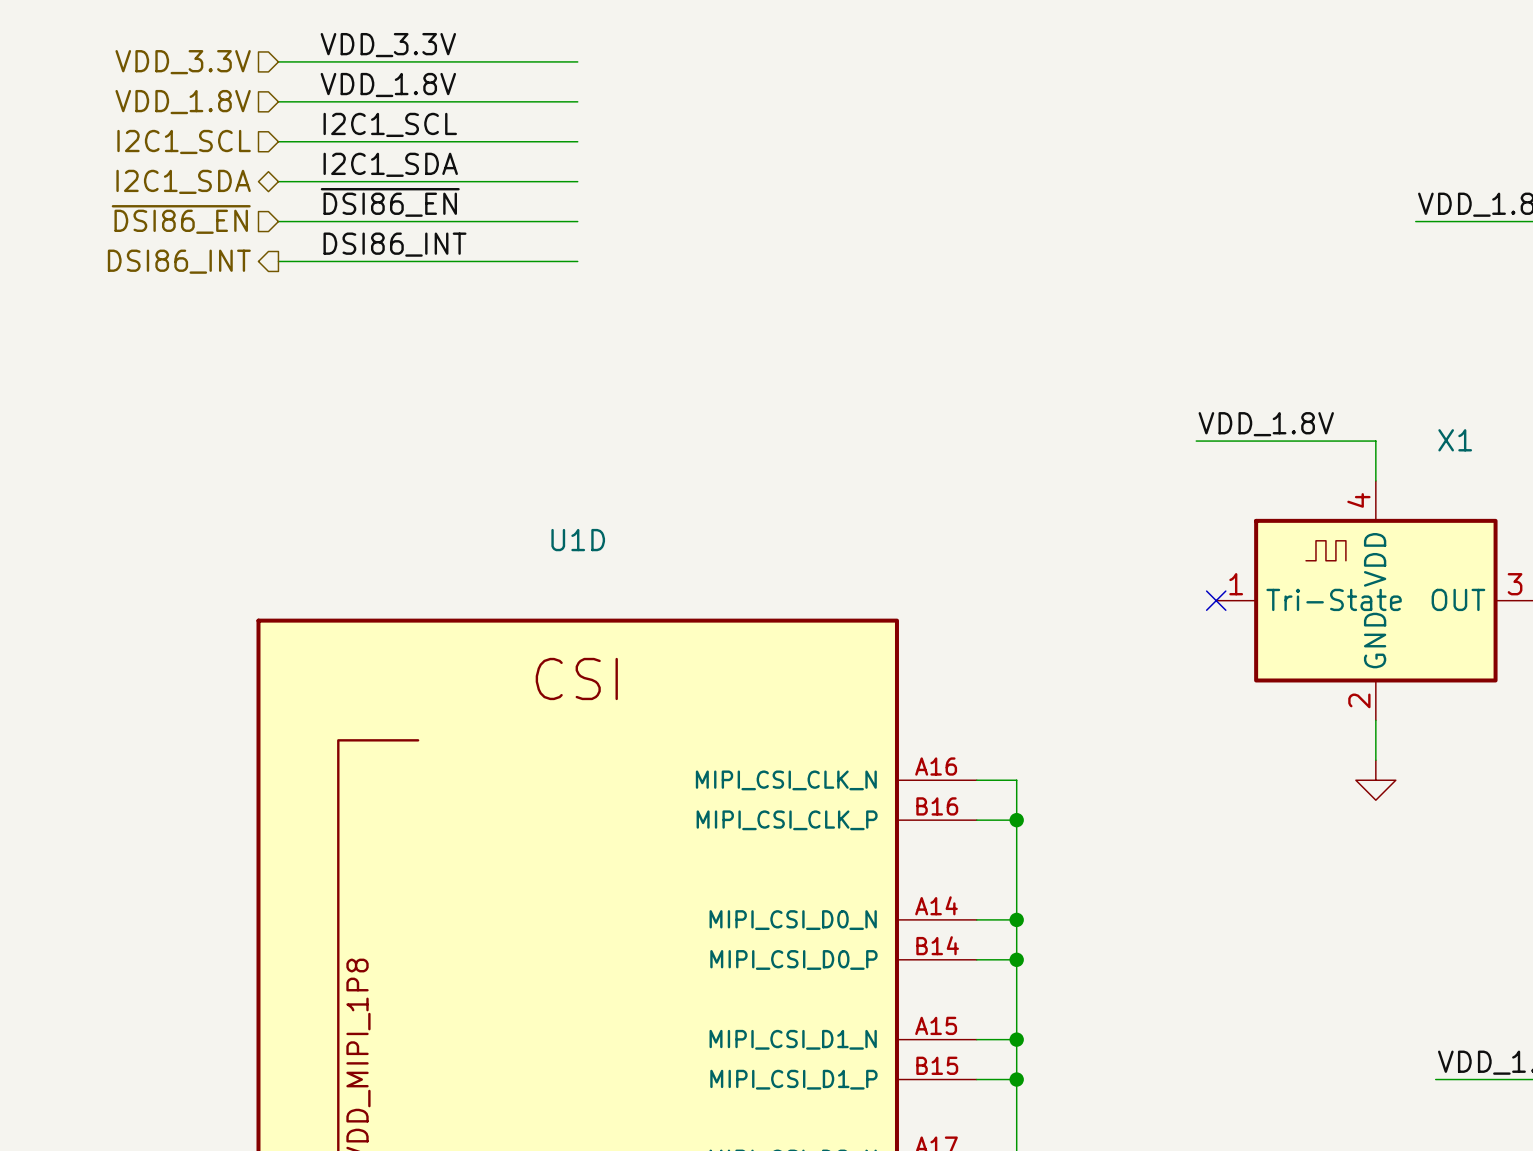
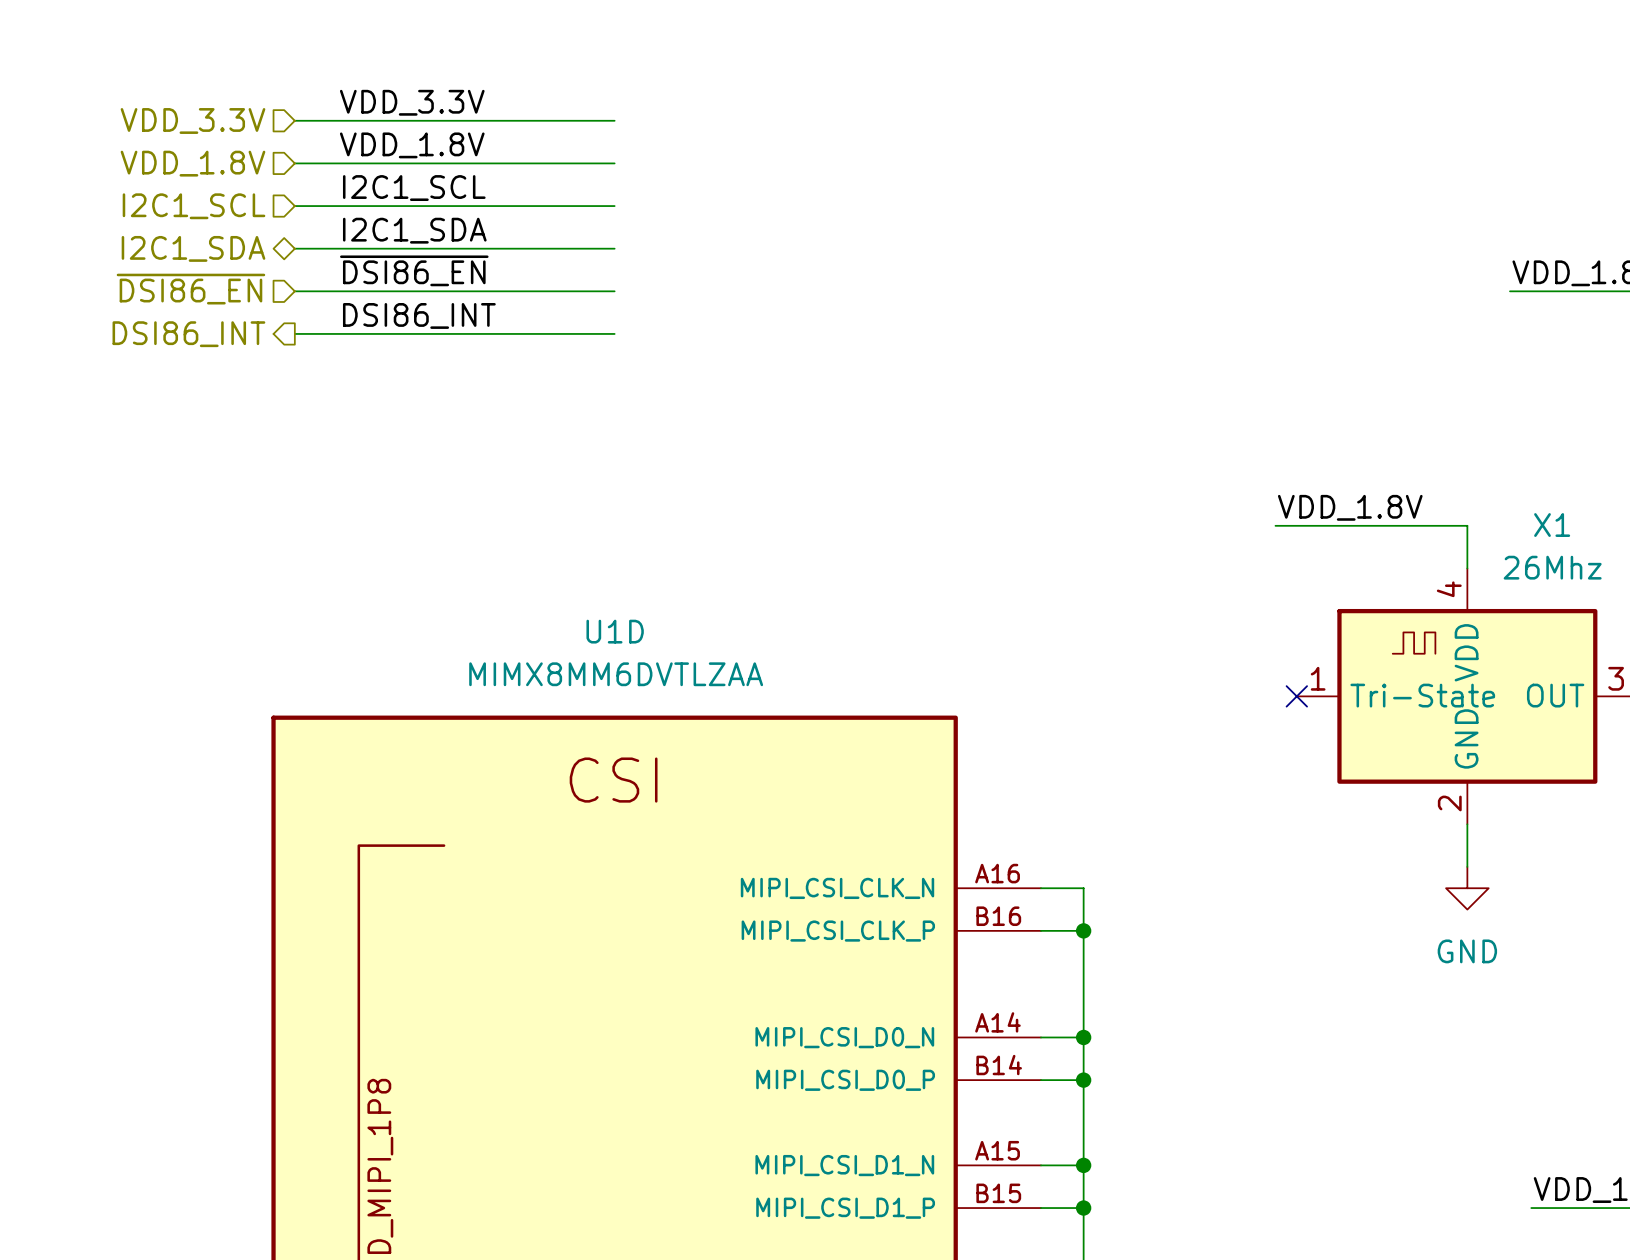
X1 value: none -> 26Mhz (1552, 567)
U1D value: none -> MIMX8MM6DVTLZAA (616, 674)
power symbol text: none -> GND (1467, 951)

